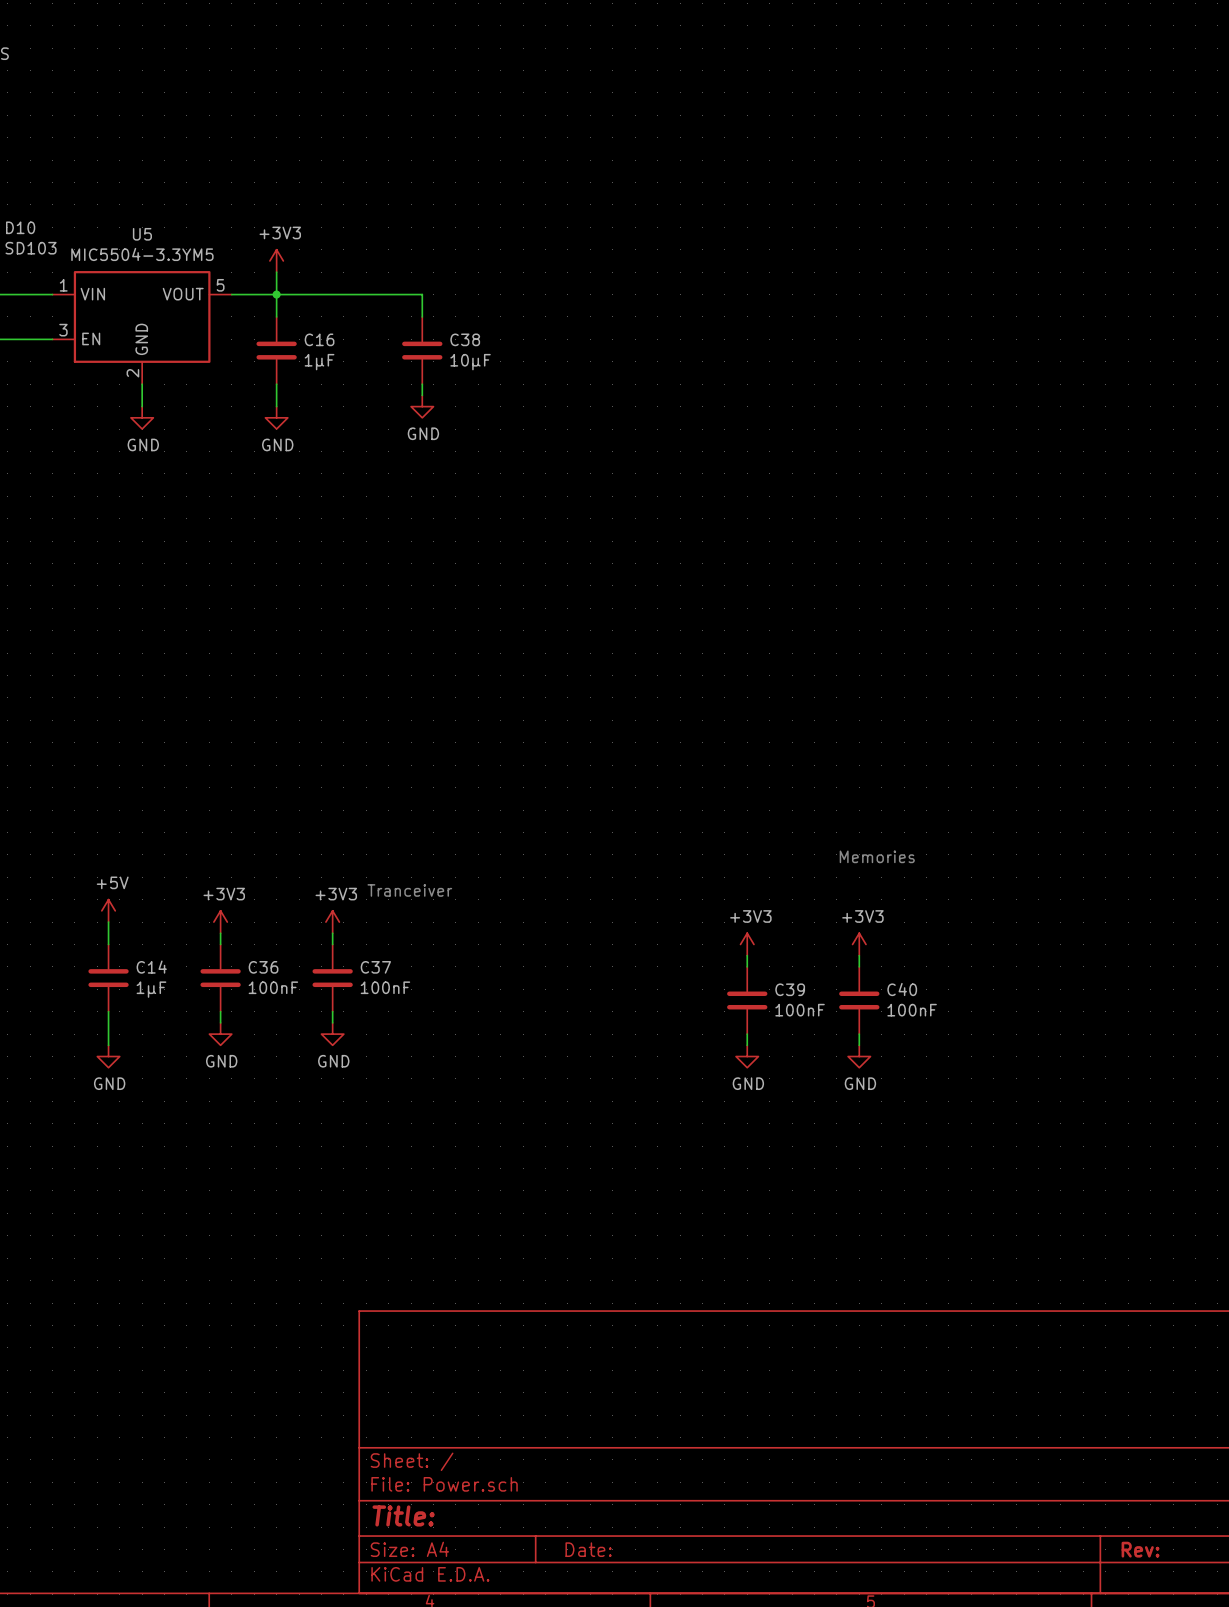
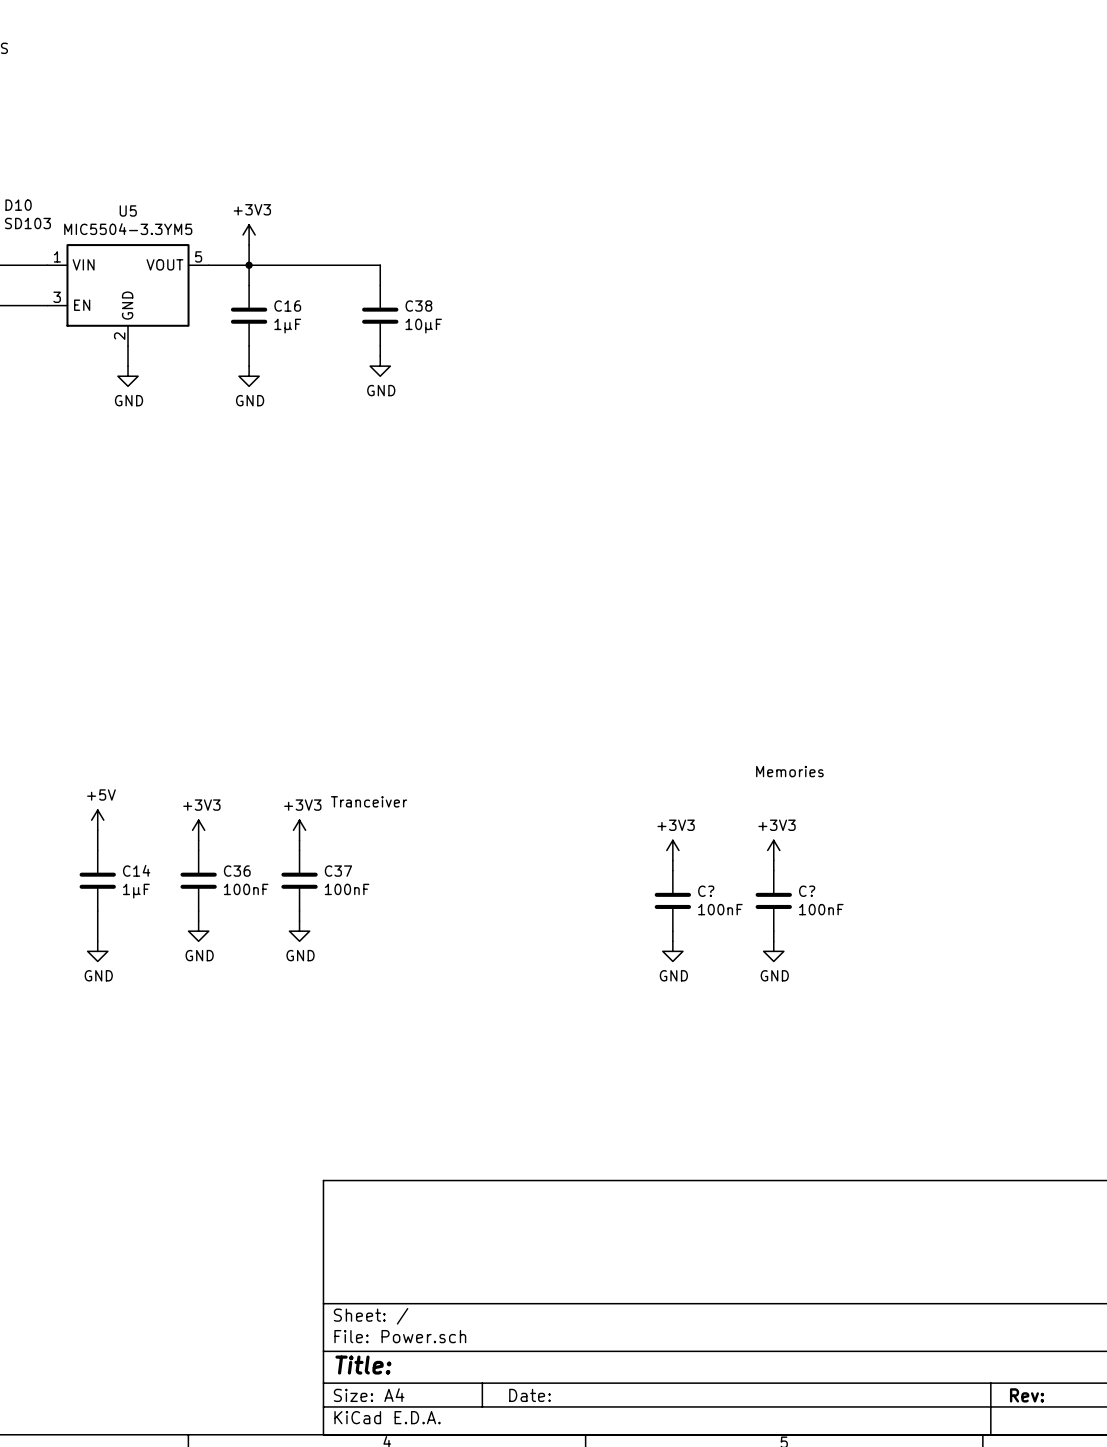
C39 name: C39 (790, 989) -> C? (706, 891)
C40 name: C40 (902, 989) -> C? (807, 891)

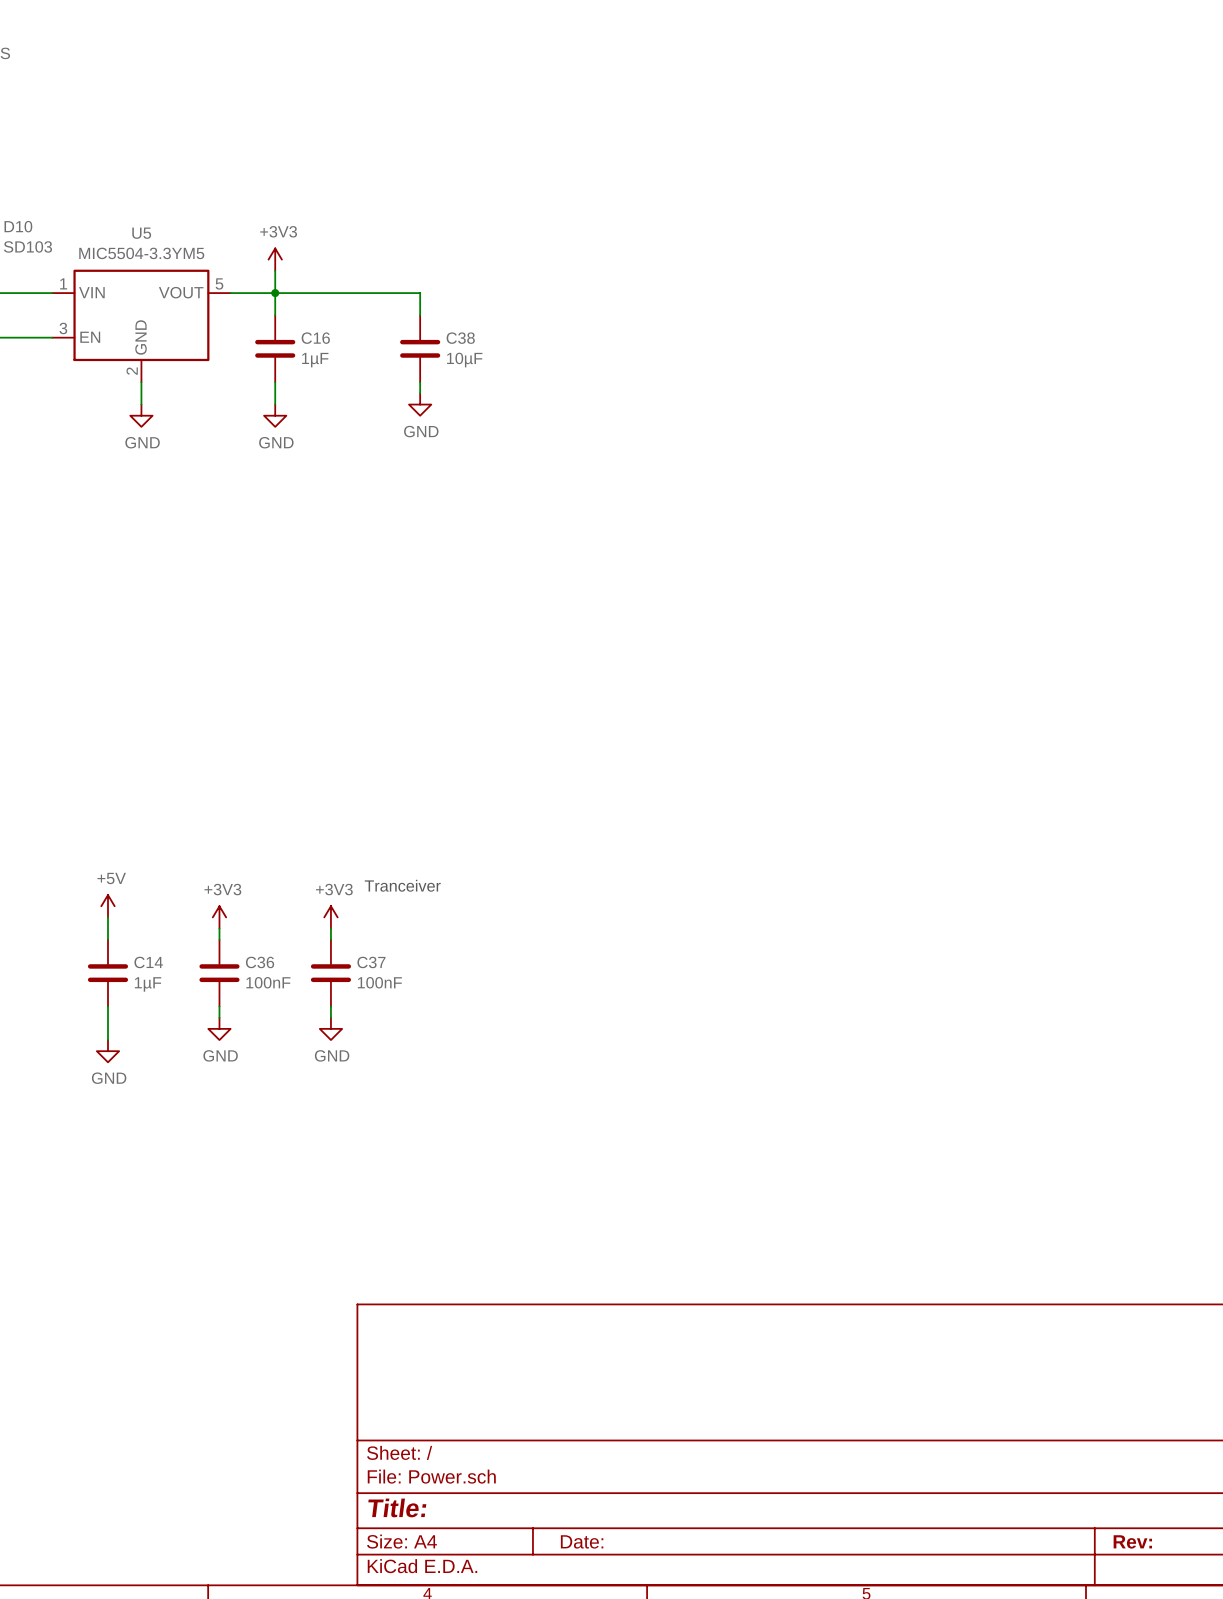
text: Memories (789, 771) -> none
power symbol: +3V3 (672, 850) -> none
power symbol: +3V3 (773, 850) -> none
wire: (672, 860) (672, 870) -> none
wire: (773, 860) (773, 870) -> none
C?: 100nF (672, 900) -> none
C?: 100nF (773, 900) -> none
wire: (672, 931) (672, 941) -> none
wire: (773, 931) (773, 941) -> none
power symbol: GND (672, 951) -> none
power symbol: GND (773, 951) -> none

